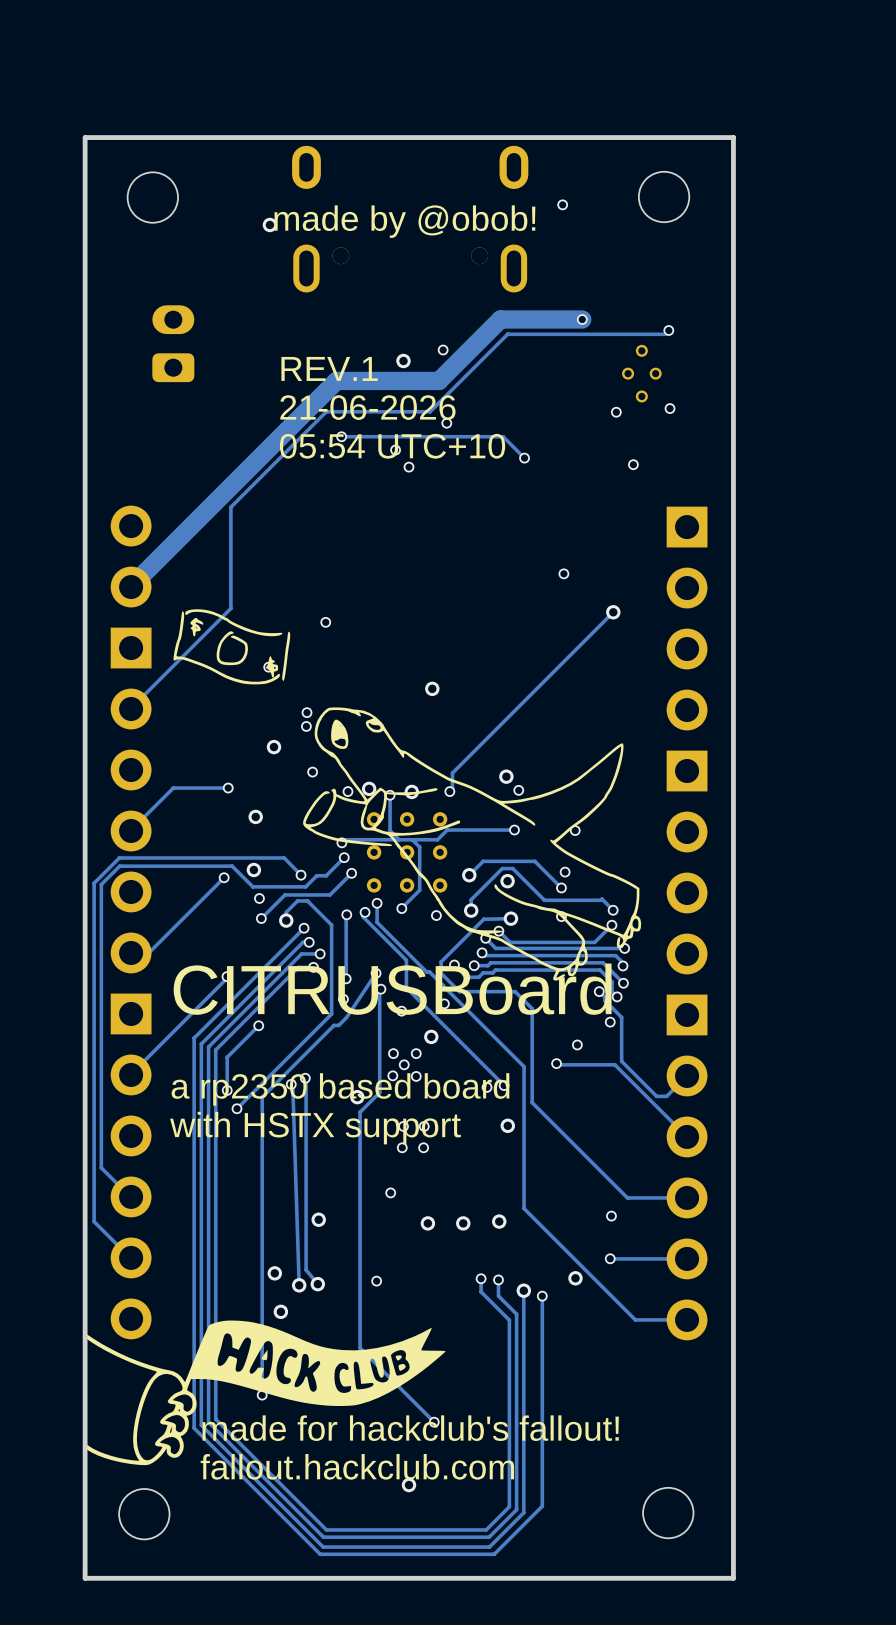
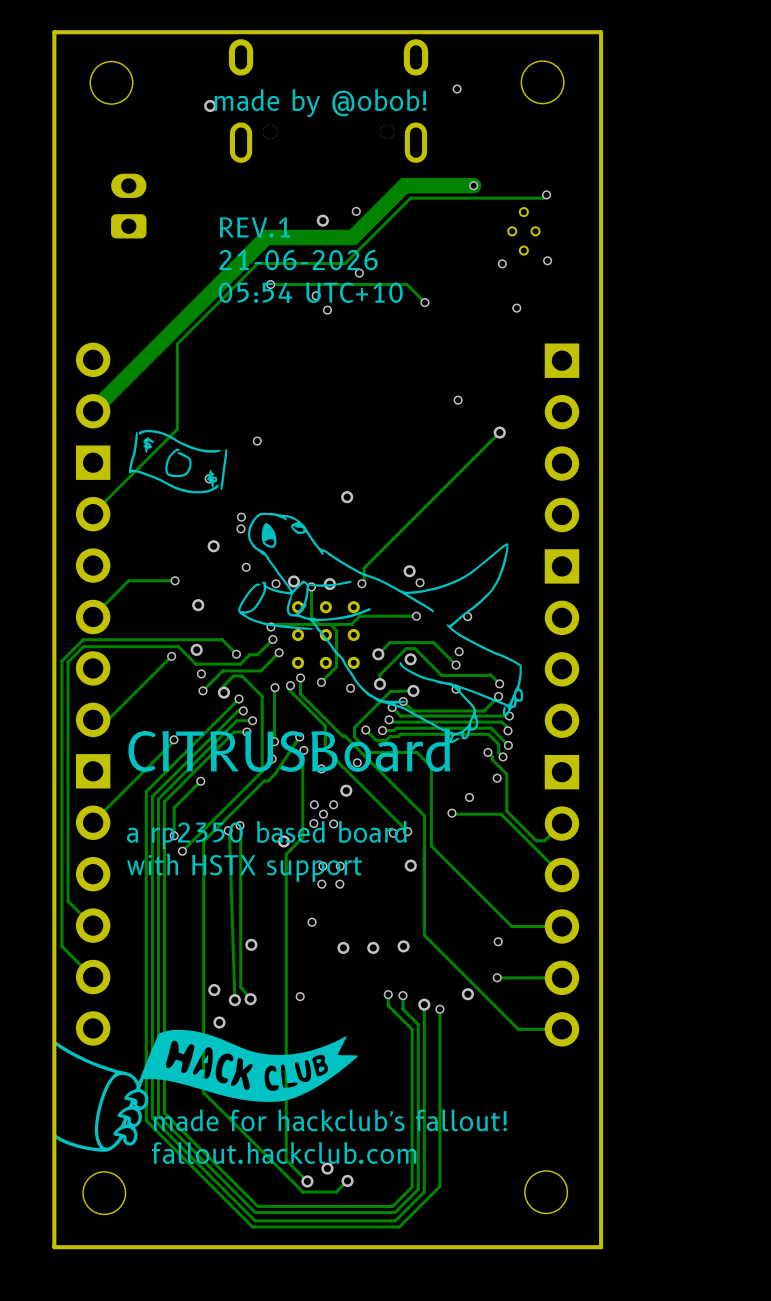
track: (360, 1348) (434, 1422) -> (286, 1053) (286, 1160) (307, 1181)
track: none -> (203, 1092) (303, 1192) (336, 1192) (347, 1180)
via: (262, 1395) -> none
via: (434, 1422) -> none
via: none -> (347, 1180)
via: none -> (307, 1181)

